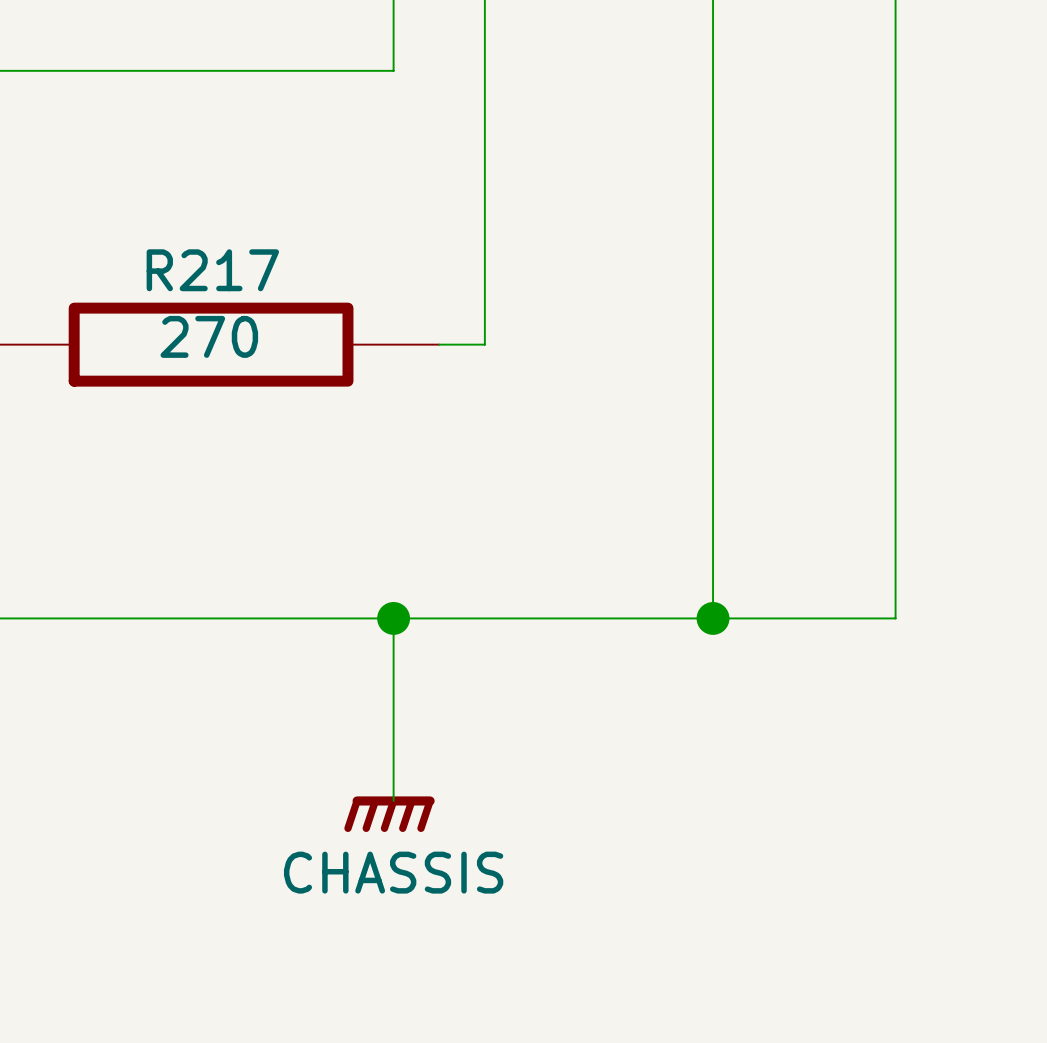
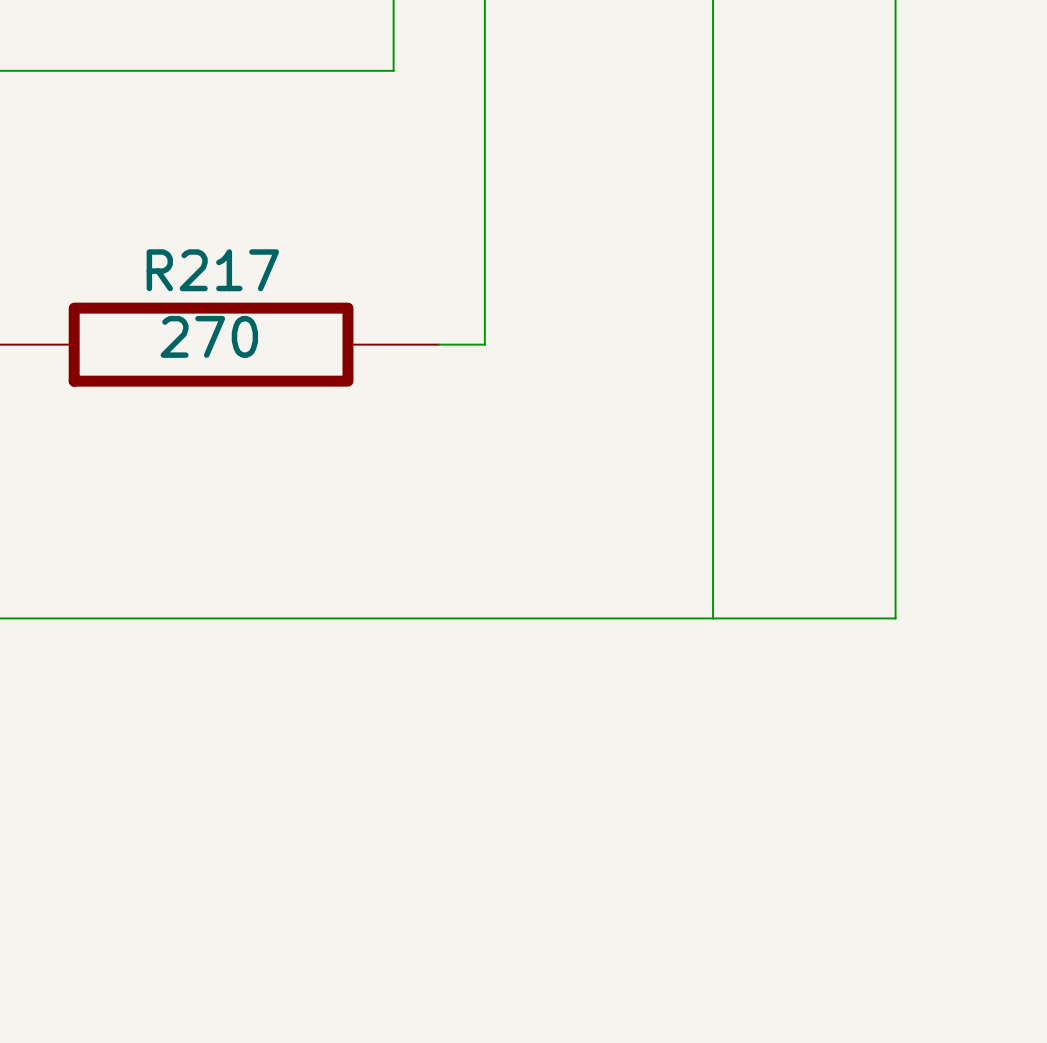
wire: (393, 618) (393, 800) -> none
junction: (393, 618) -> none
junction: (713, 618) -> none
power symbol: CHASSIS (389, 814) -> none

